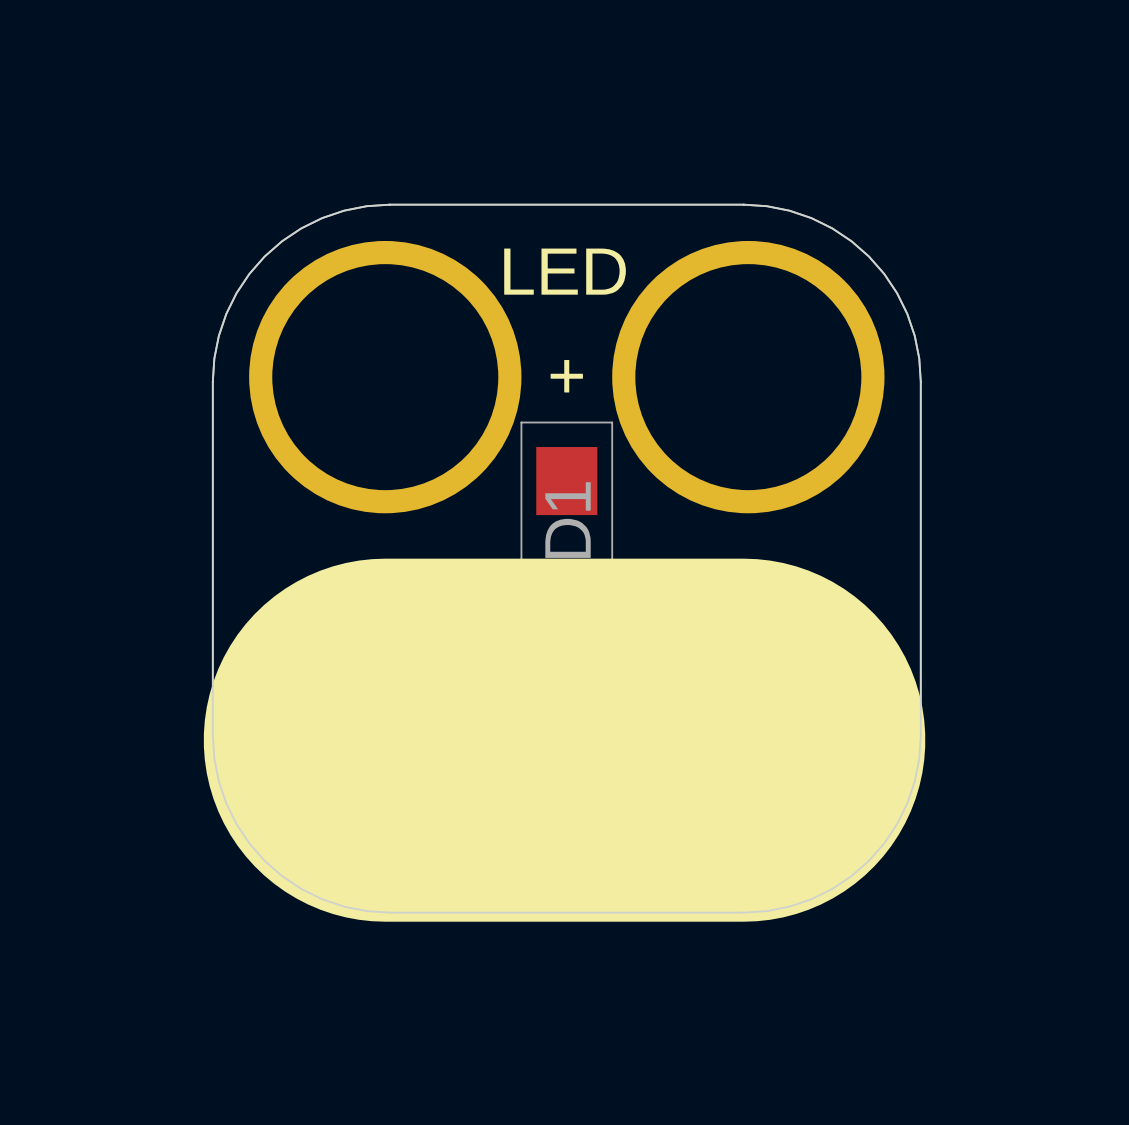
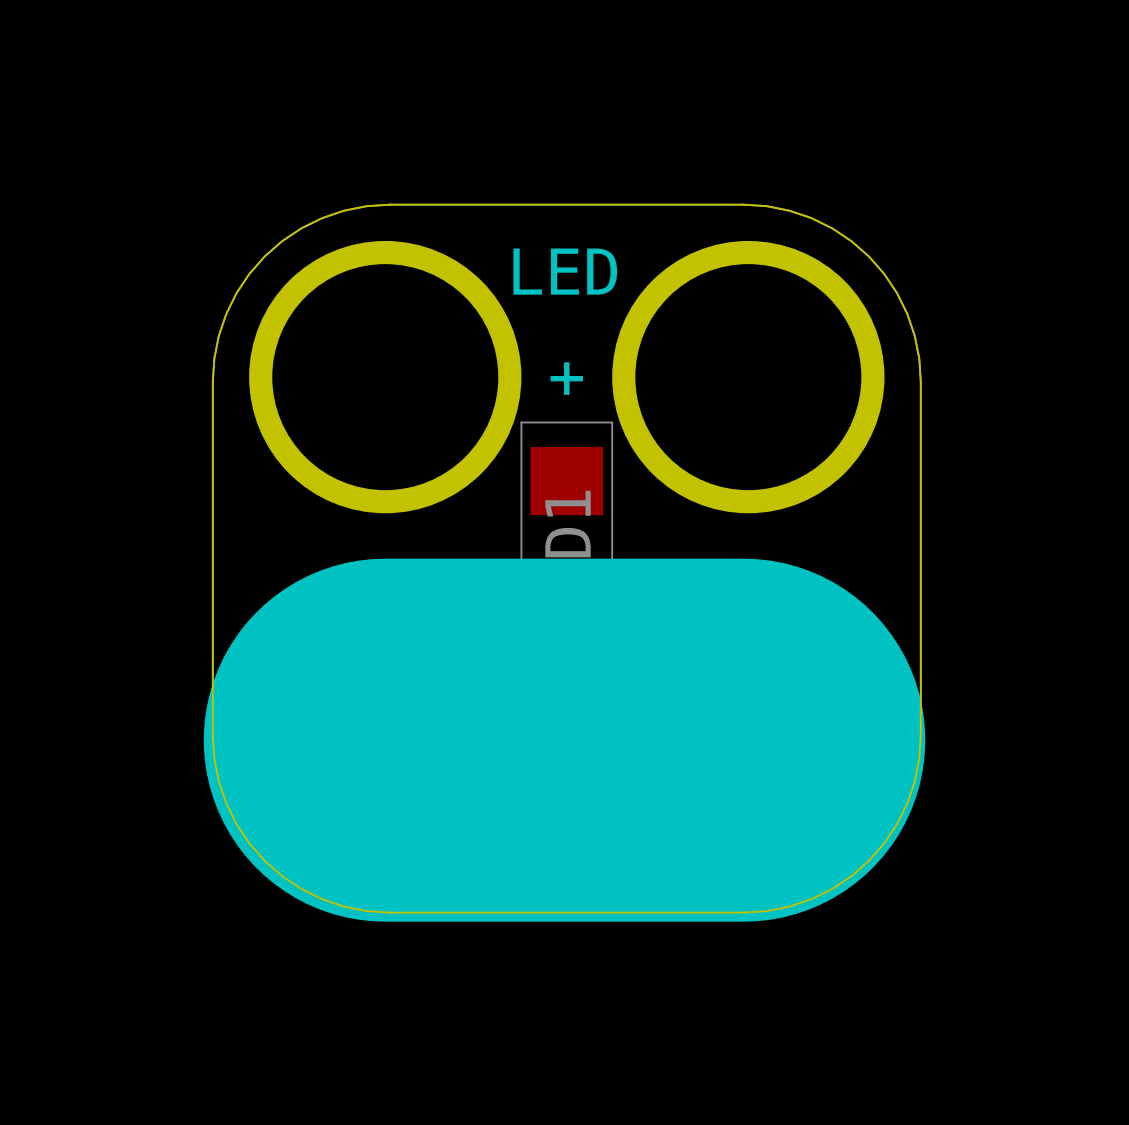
LED1 footprint: [203, 203, 926, 922] -> [203, 203, 926, 922]

